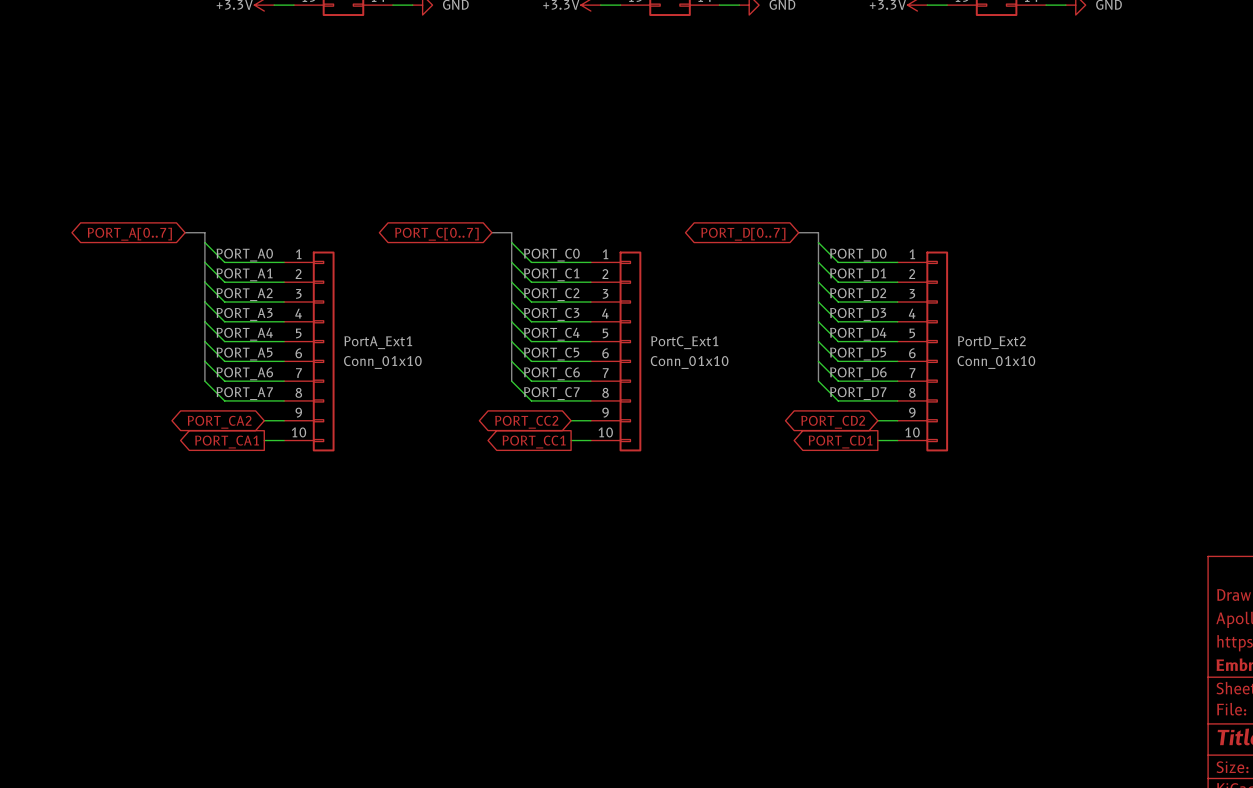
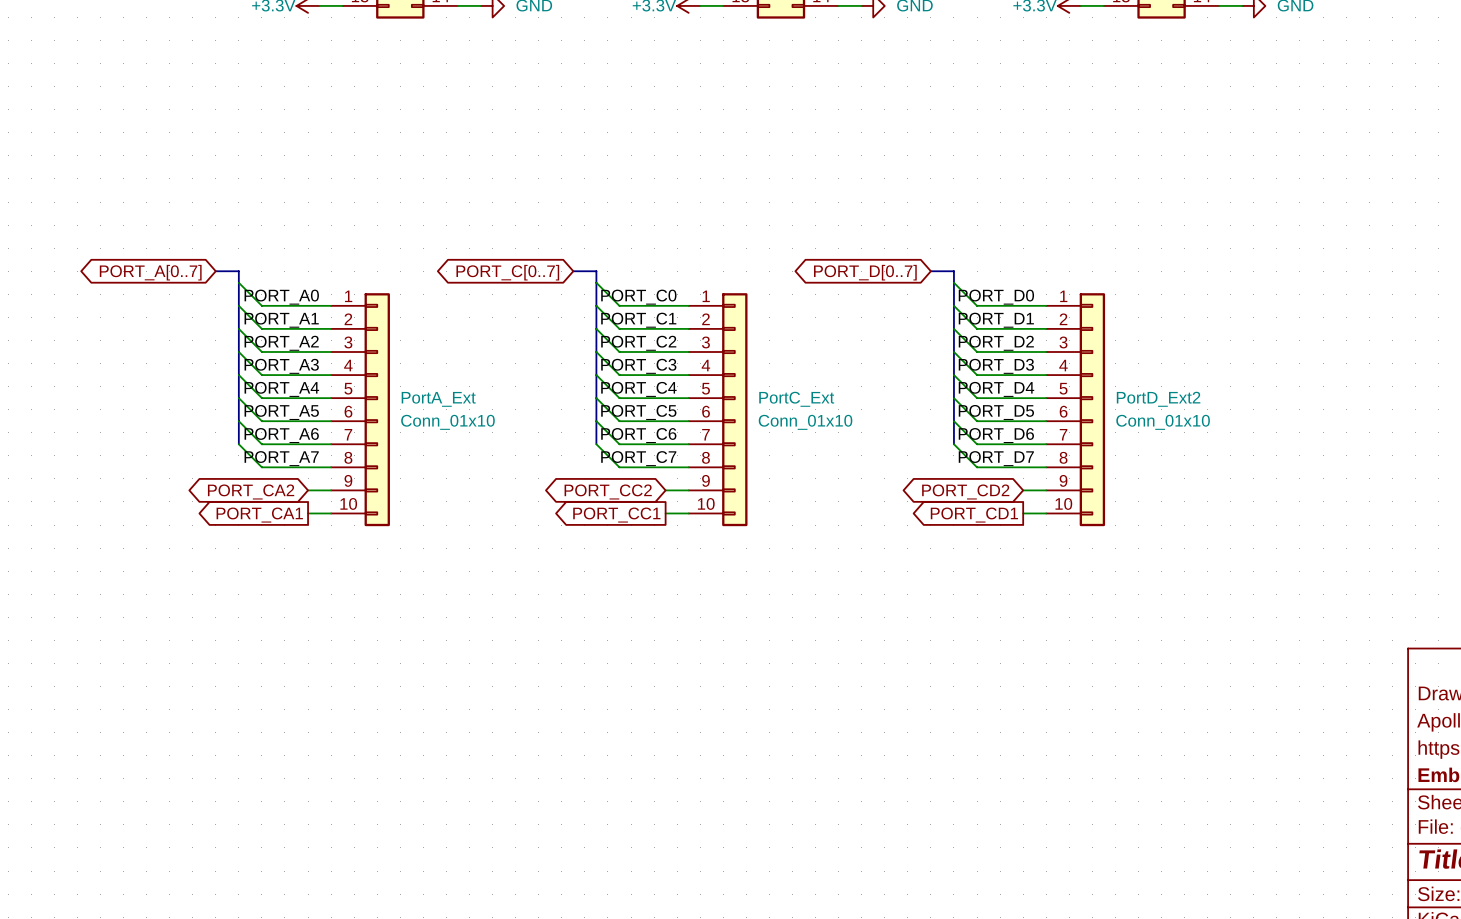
PortA_Ext1 name: PortA_Ext1 (378, 342) -> PortA_Ext (438, 399)
PortC_Ext1 name: PortC_Ext1 (684, 342) -> PortC_Ext (796, 399)

